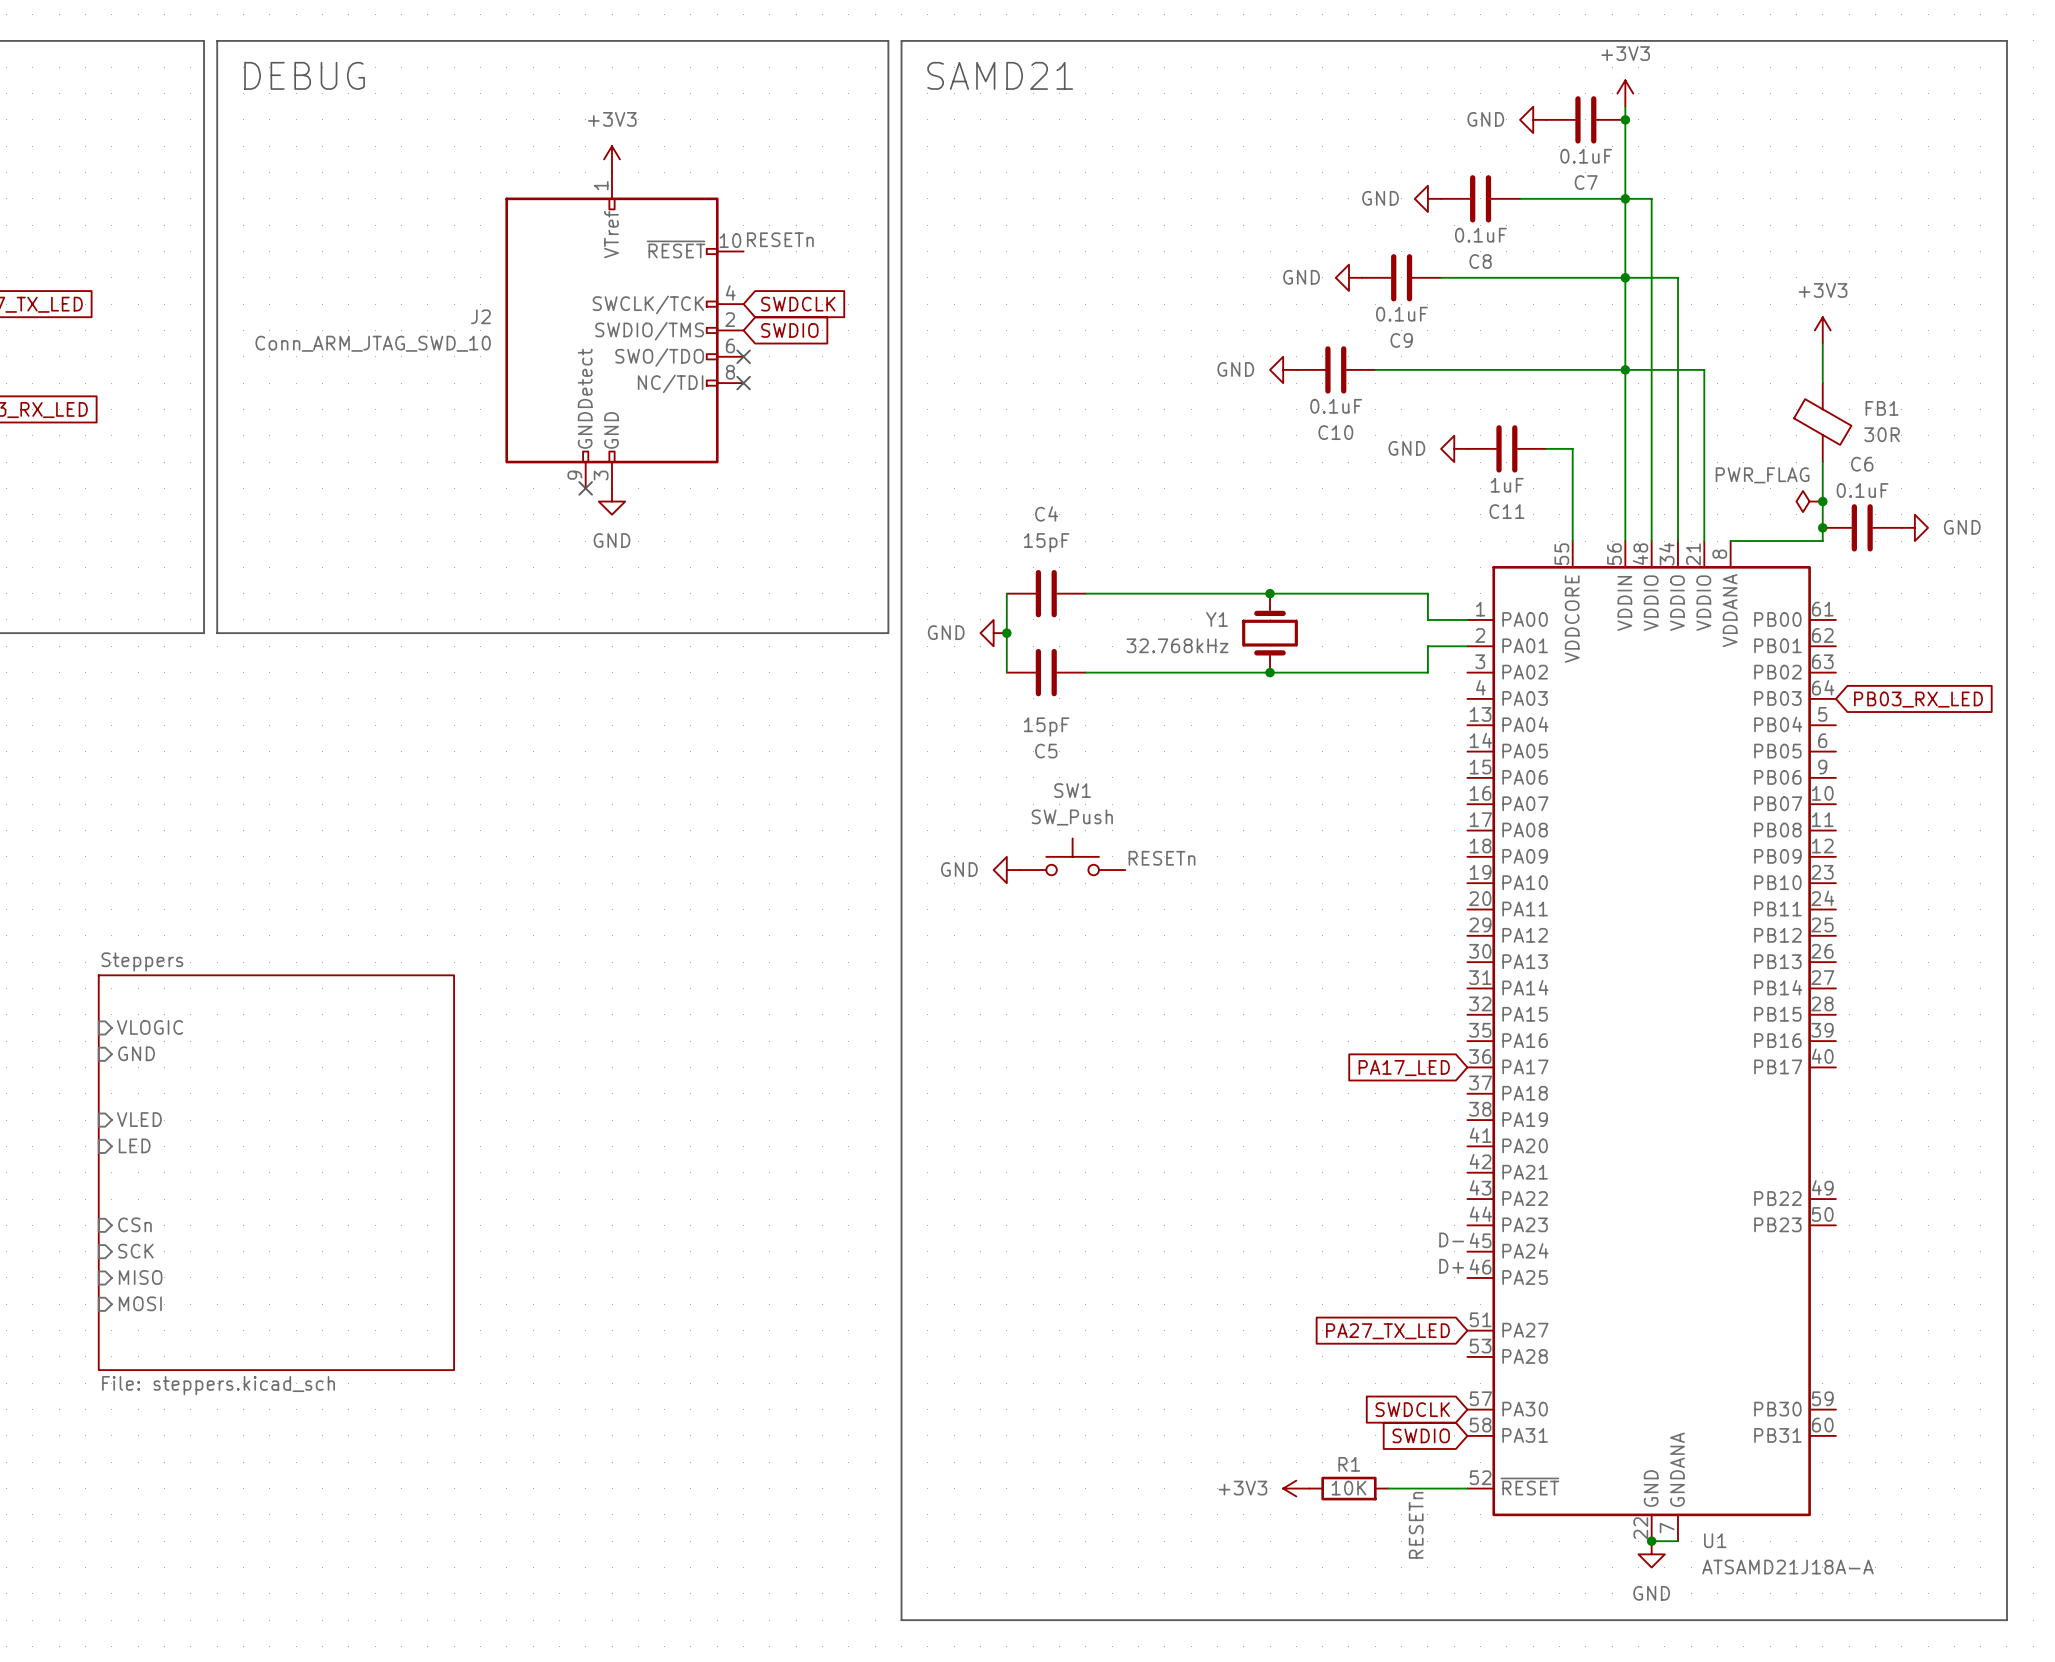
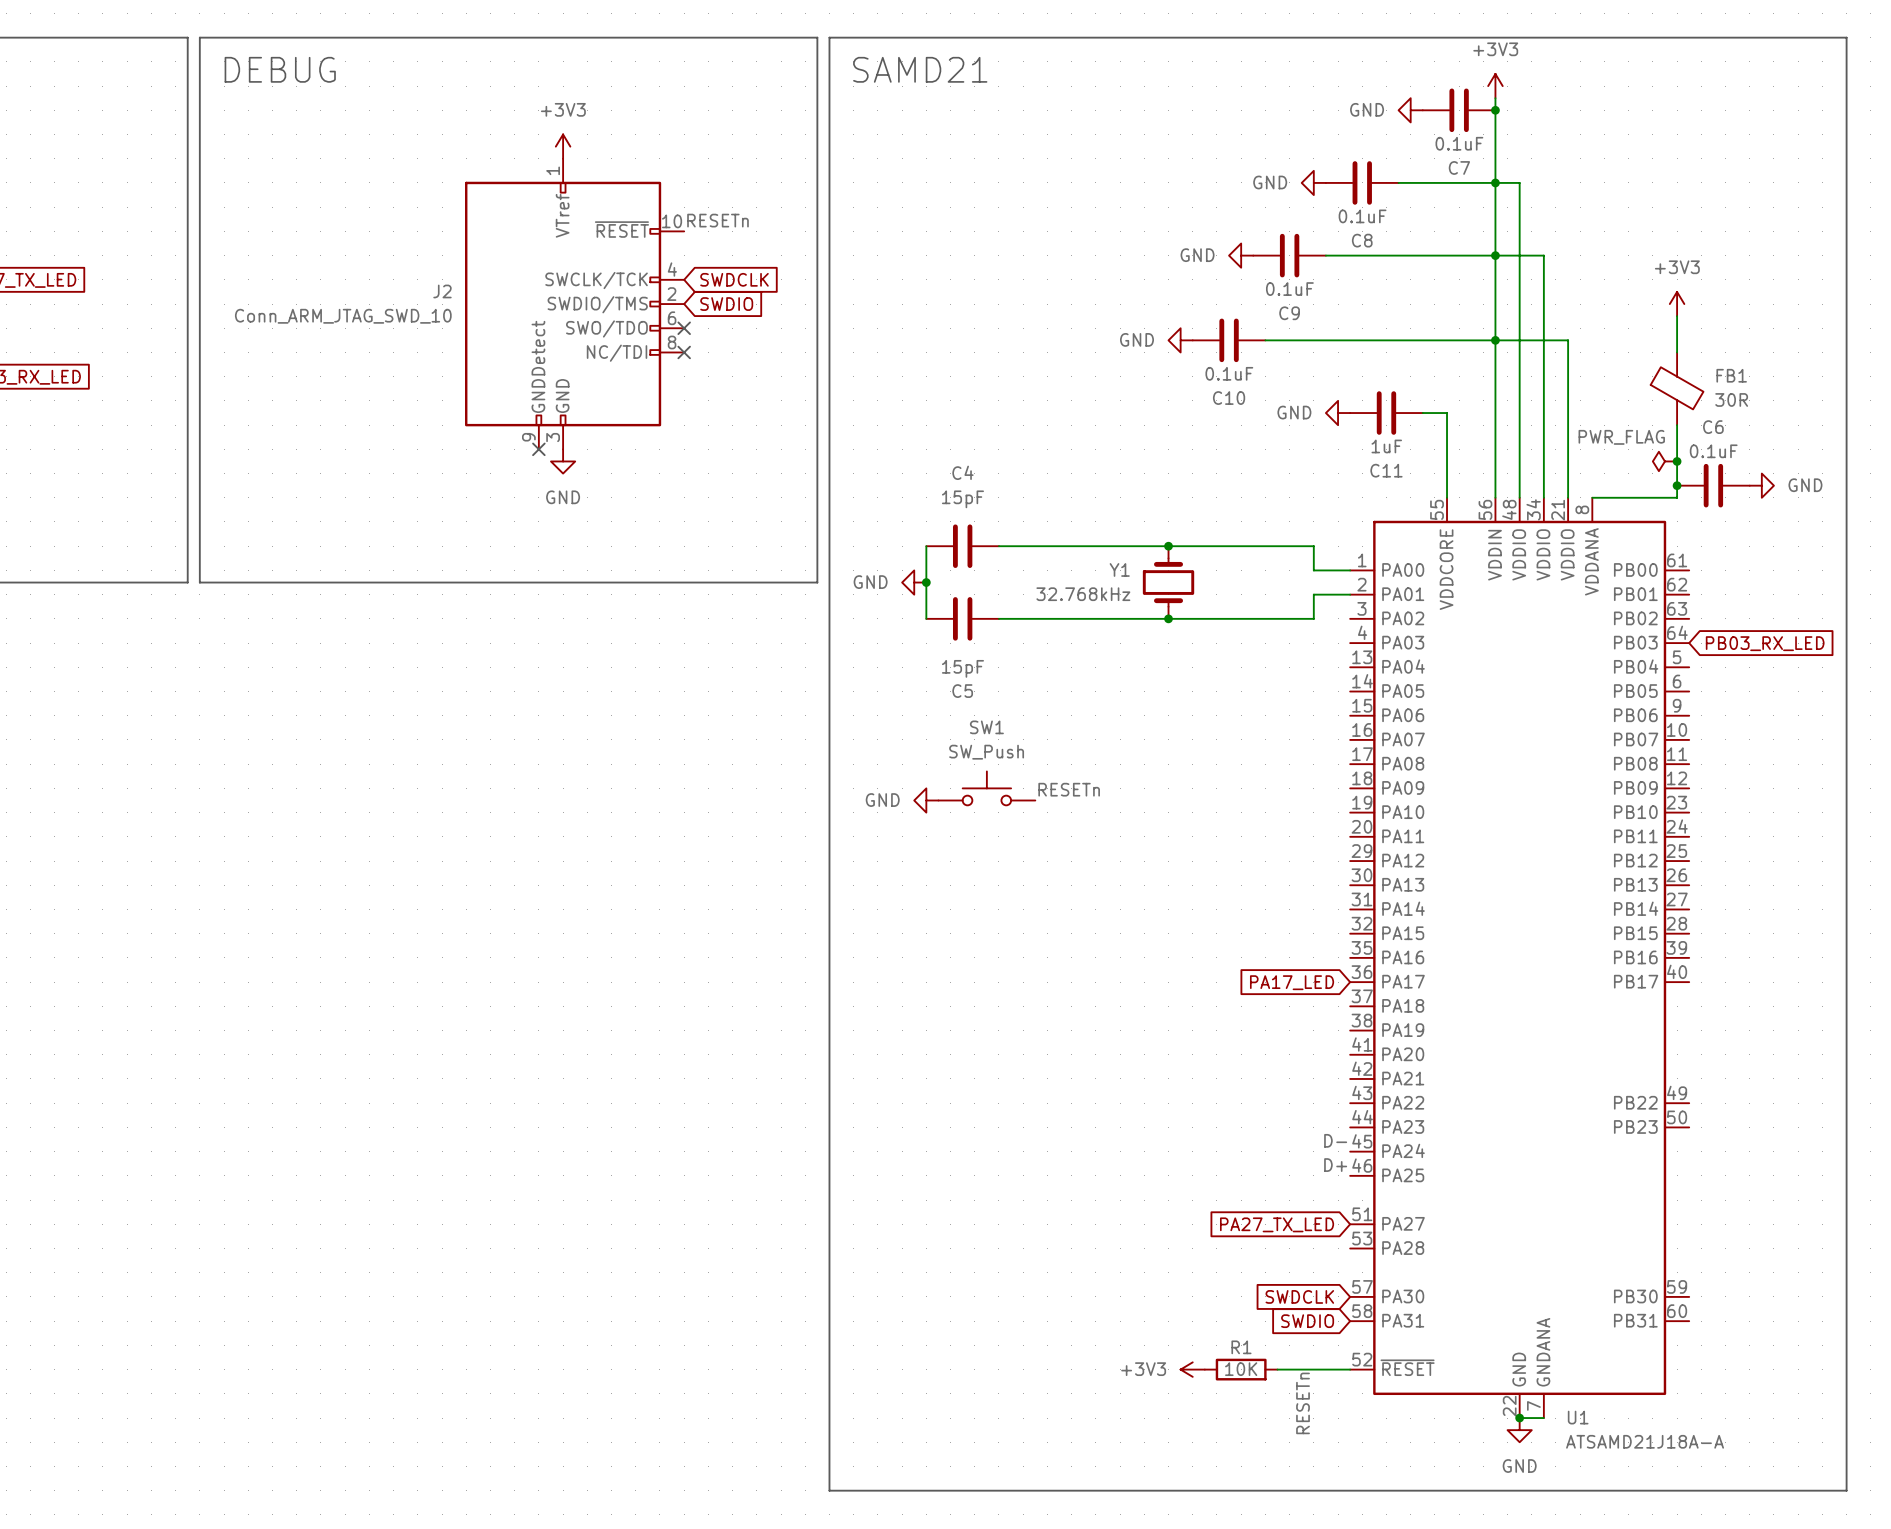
sheet pin: VLOGIC (150, 1027) -> none
sheet pin: GND (136, 1053) -> none
sheet pin: VLED (139, 1119) -> none
sheet pin: LED (134, 1145) -> none
sheet Steppers: File: steppers.kicad_sch (276, 1172) -> none
sheet pin: CSn (134, 1224) -> none
sheet pin: SCK (135, 1251) -> none
sheet pin: MISO (140, 1277) -> none
sheet pin: MOSI (140, 1303) -> none

